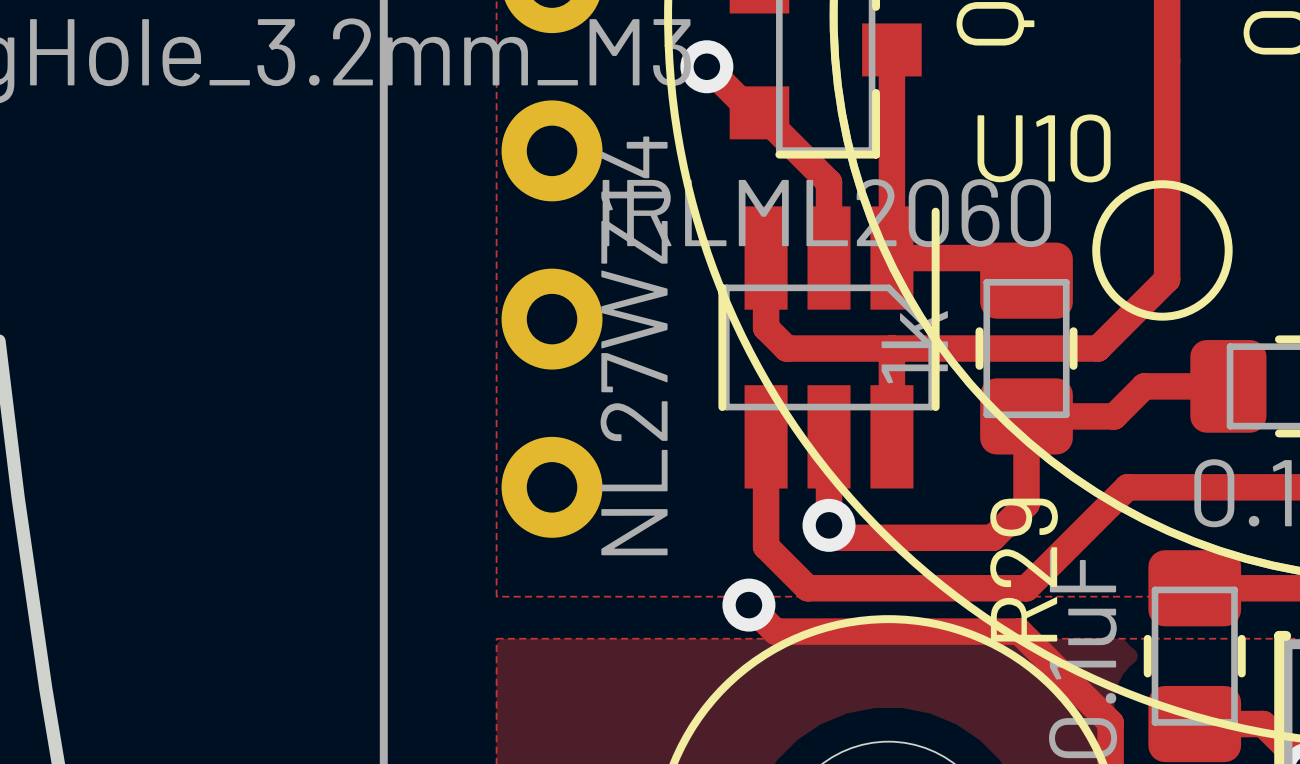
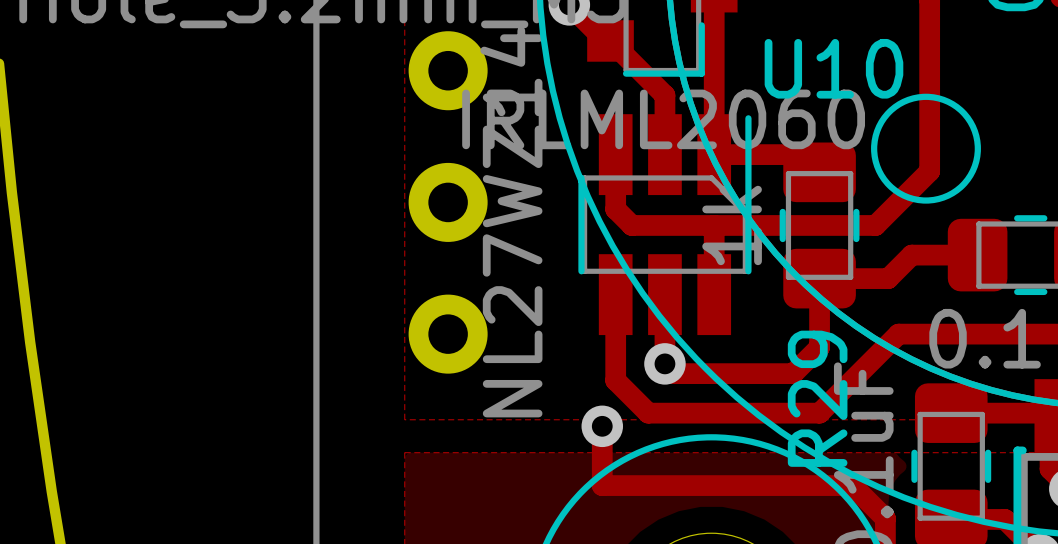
track: (748, 605) (775, 631) (1019, 631) (1068, 680) -> (602, 426) (602, 485) (852, 485)

